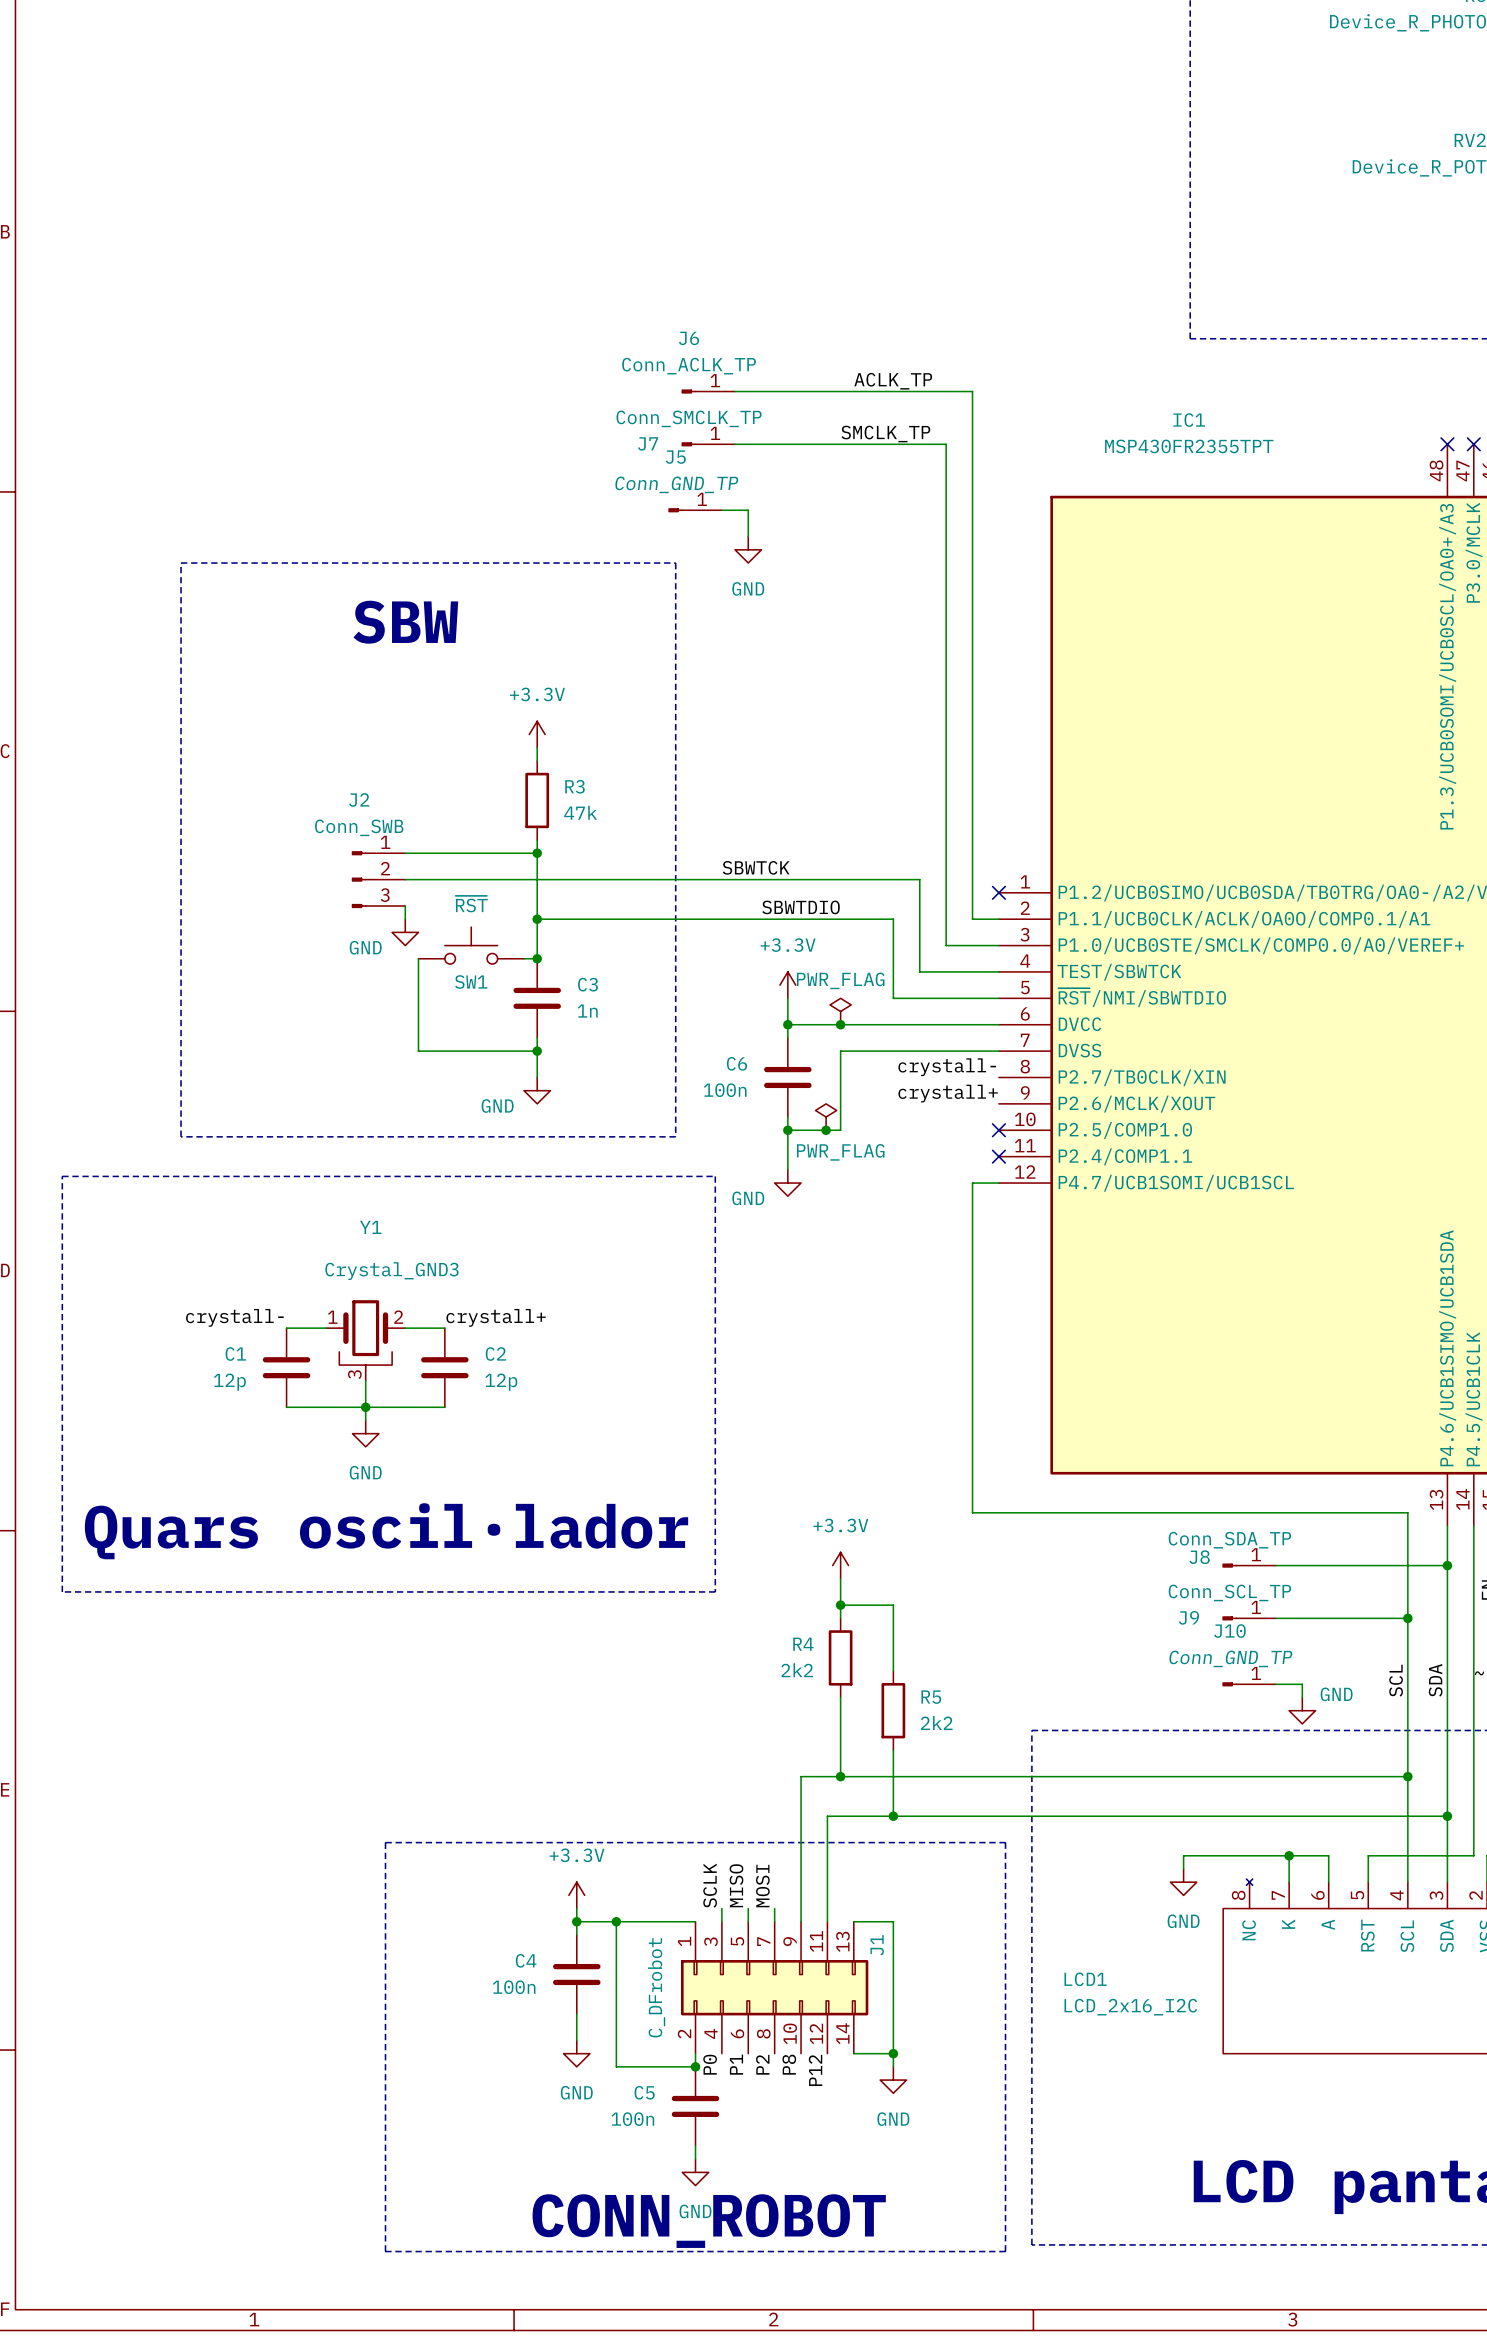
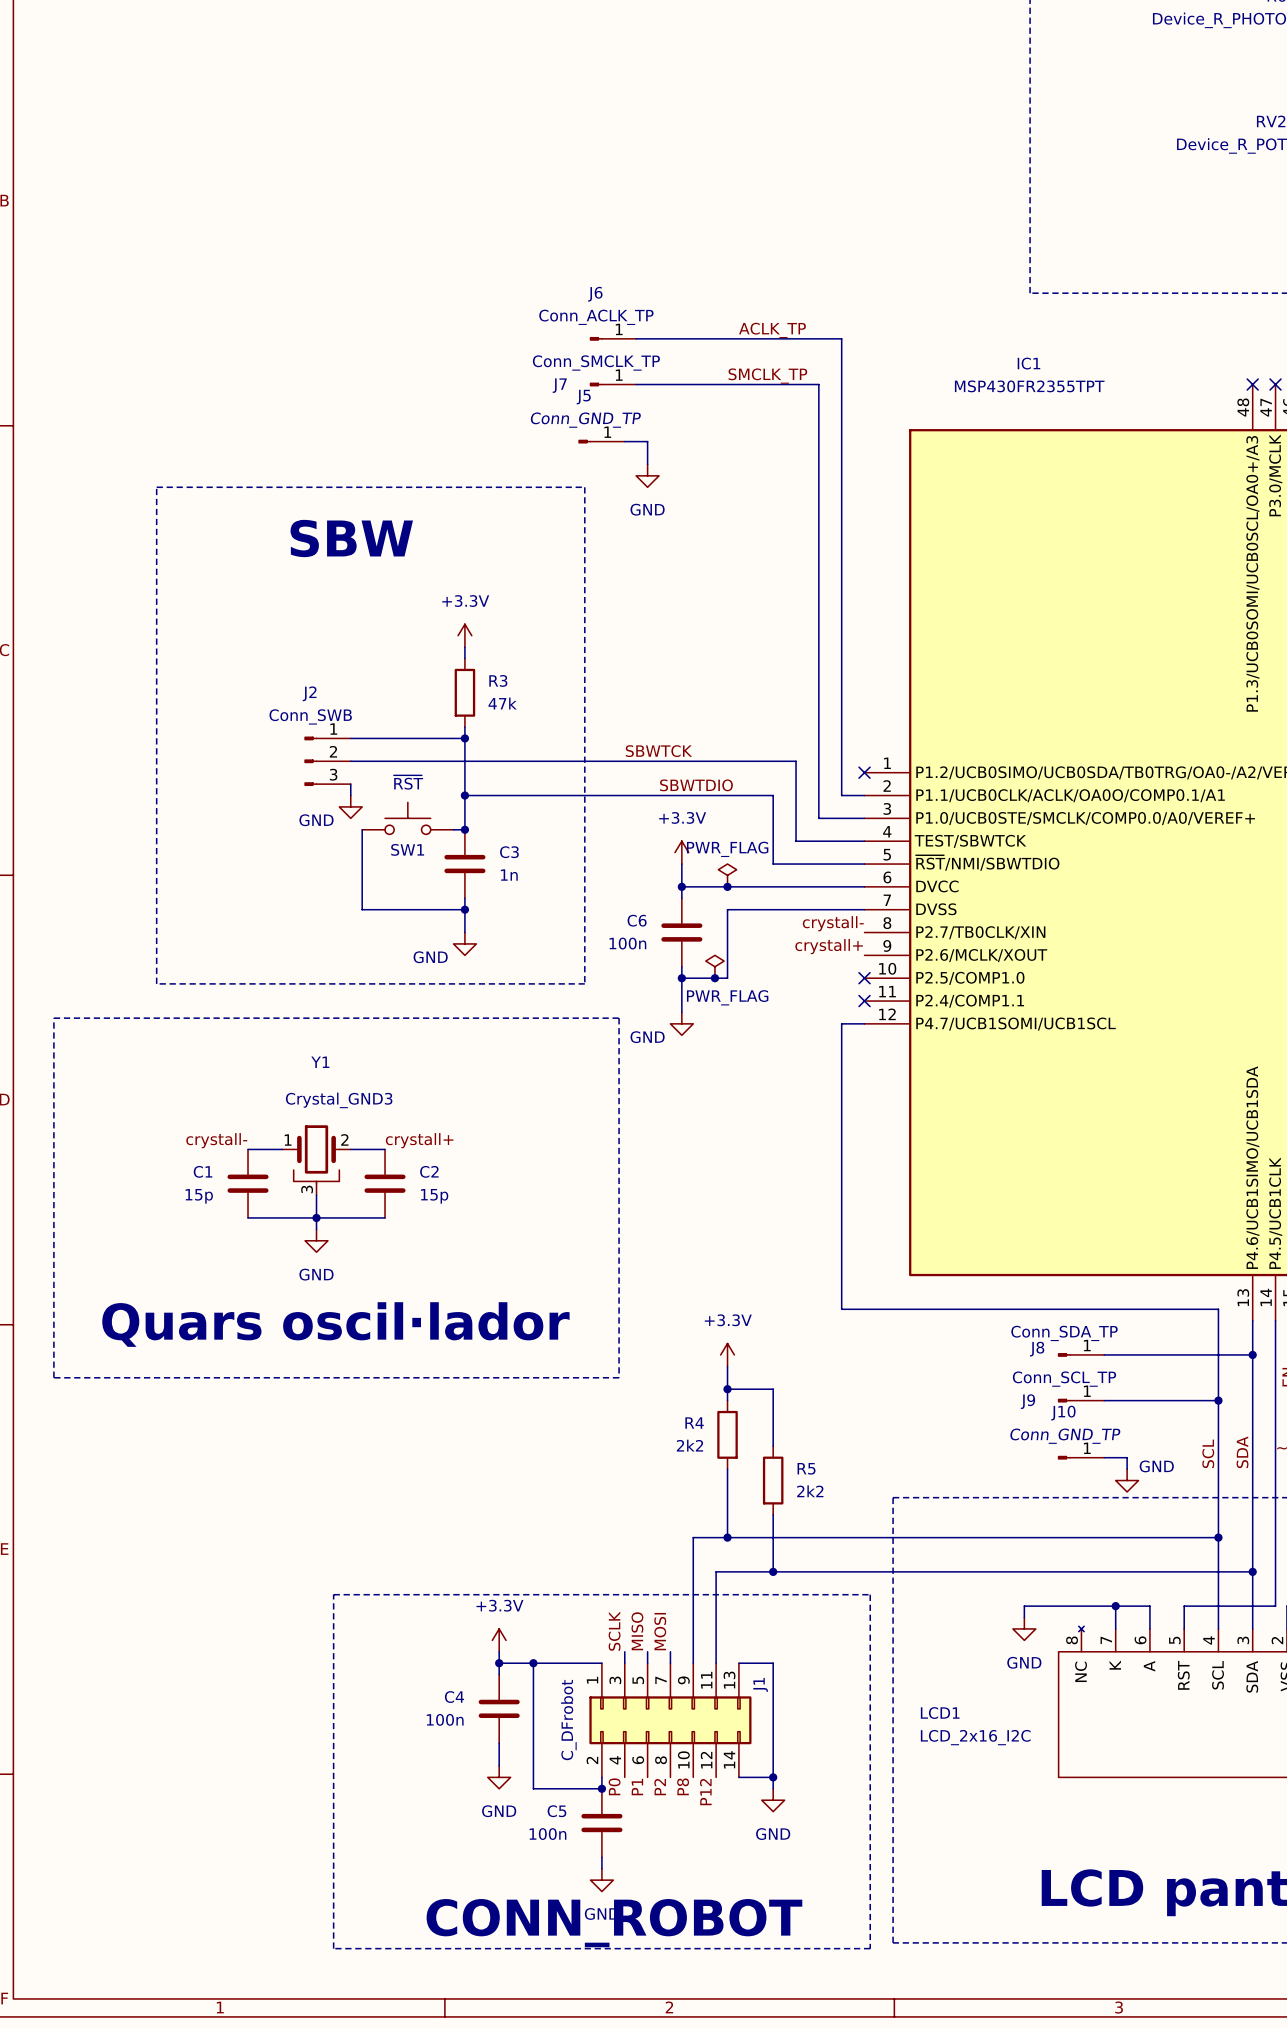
C1 value: 12p (229, 1382) -> 15p (199, 1196)
C2 value: 12p (501, 1382) -> 15p (434, 1196)

